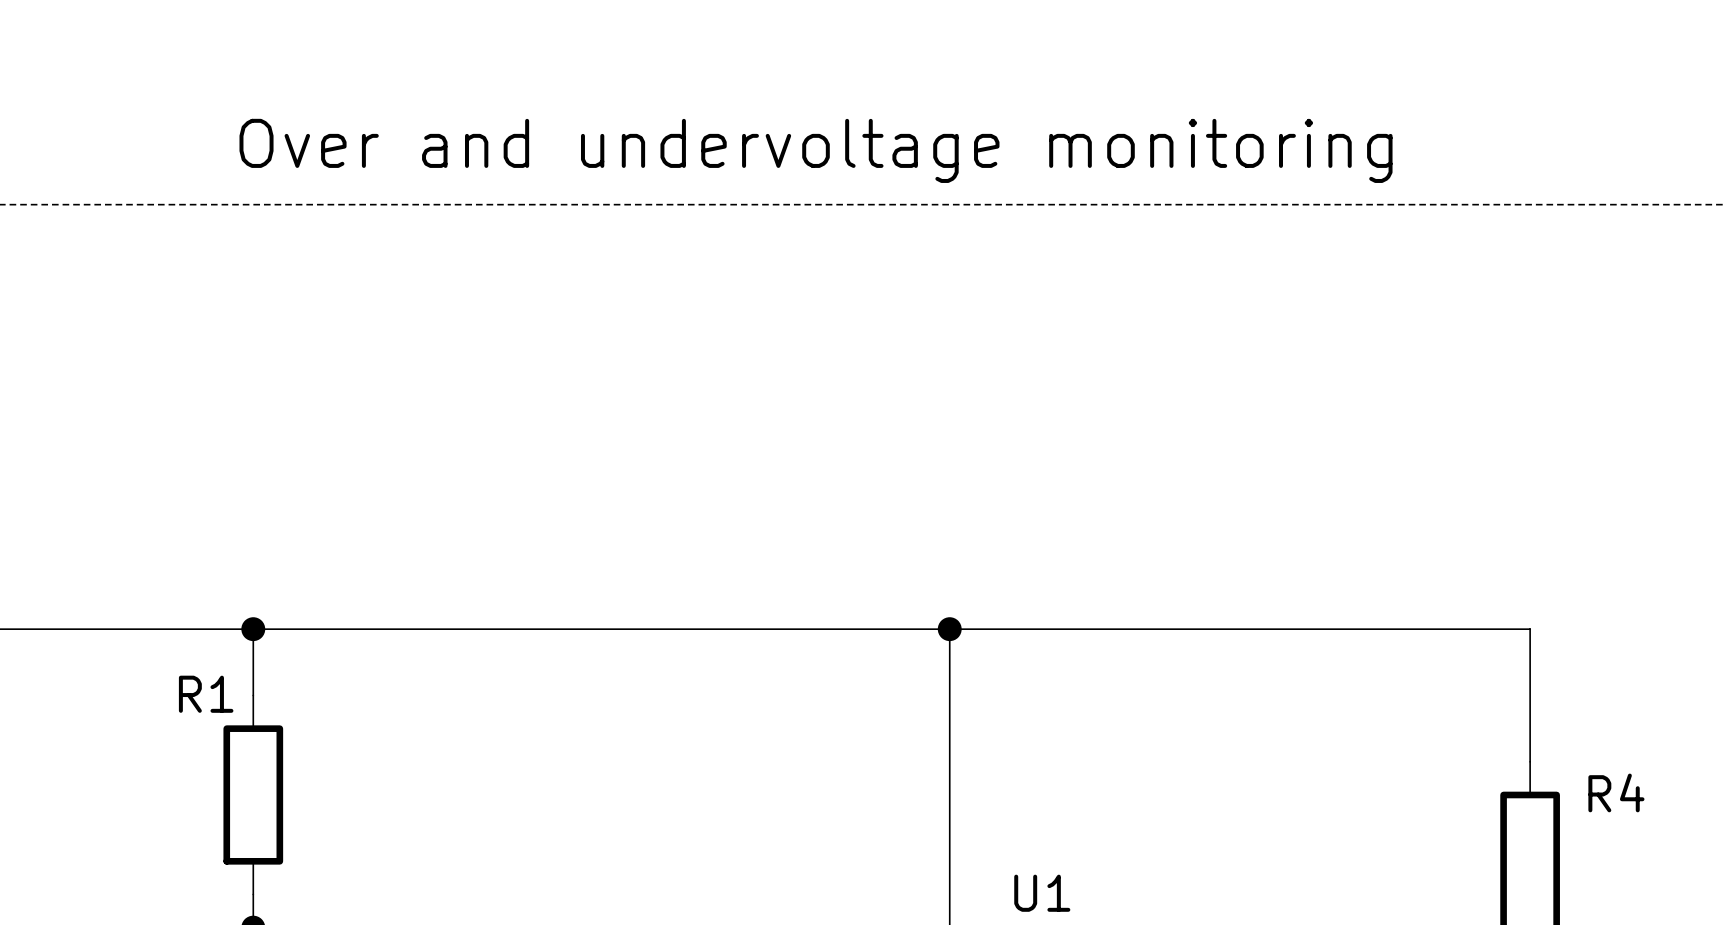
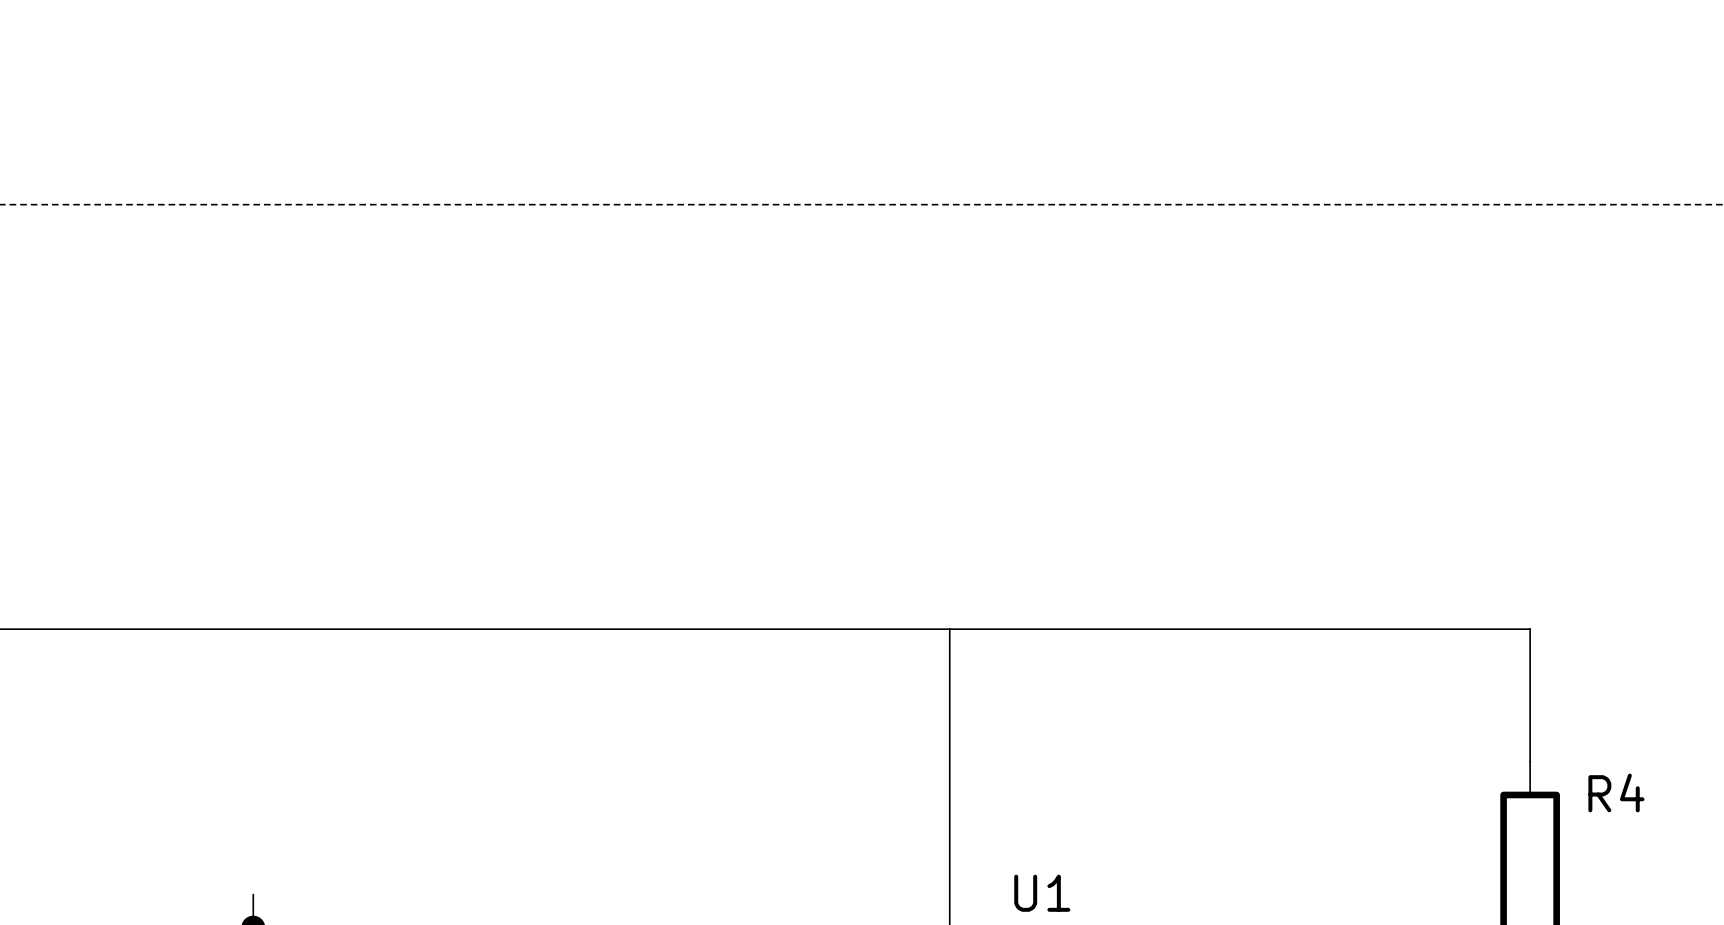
text: Over and undervoltage monitoring (816, 150) -> none
wire: (253, 629) (253, 695) -> none
junction: (253, 629) -> none
junction: (949, 629) -> none
R1: (253, 794) -> none

